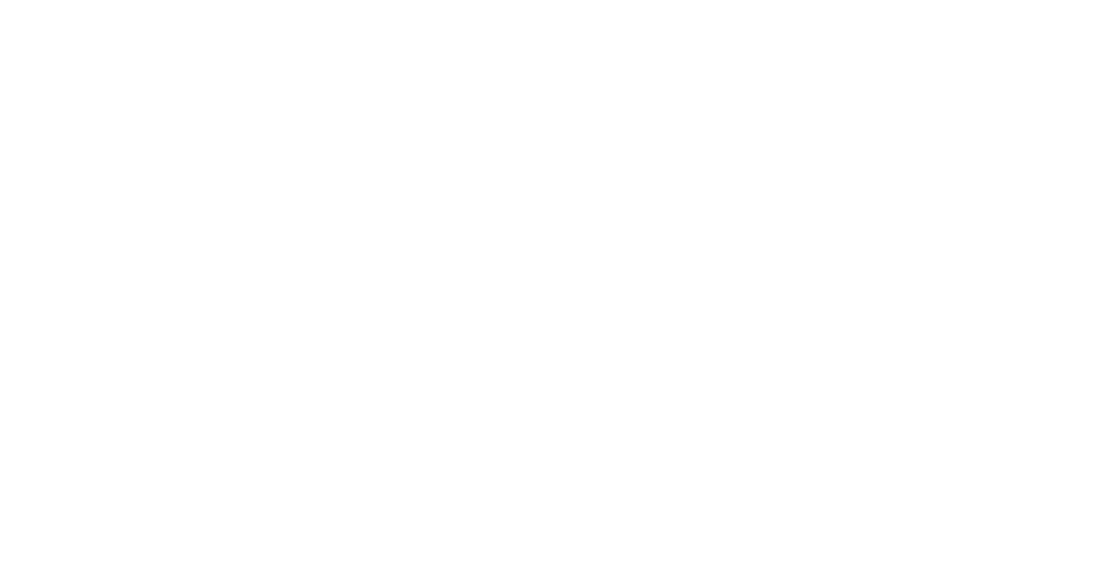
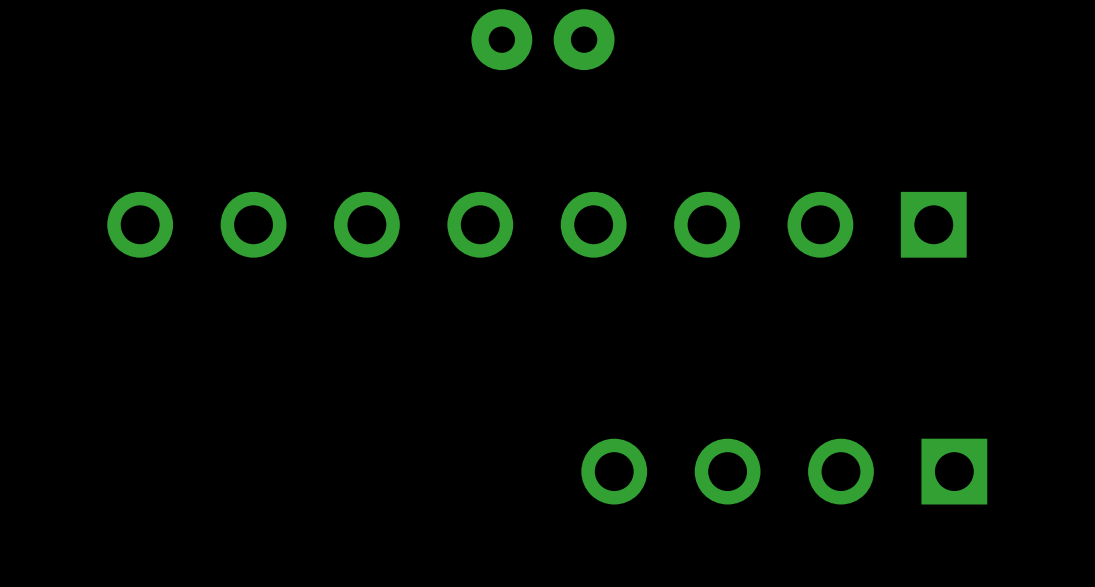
part: none -> (542, 39)
part: none -> (536, 224)
part: none -> (784, 471)

